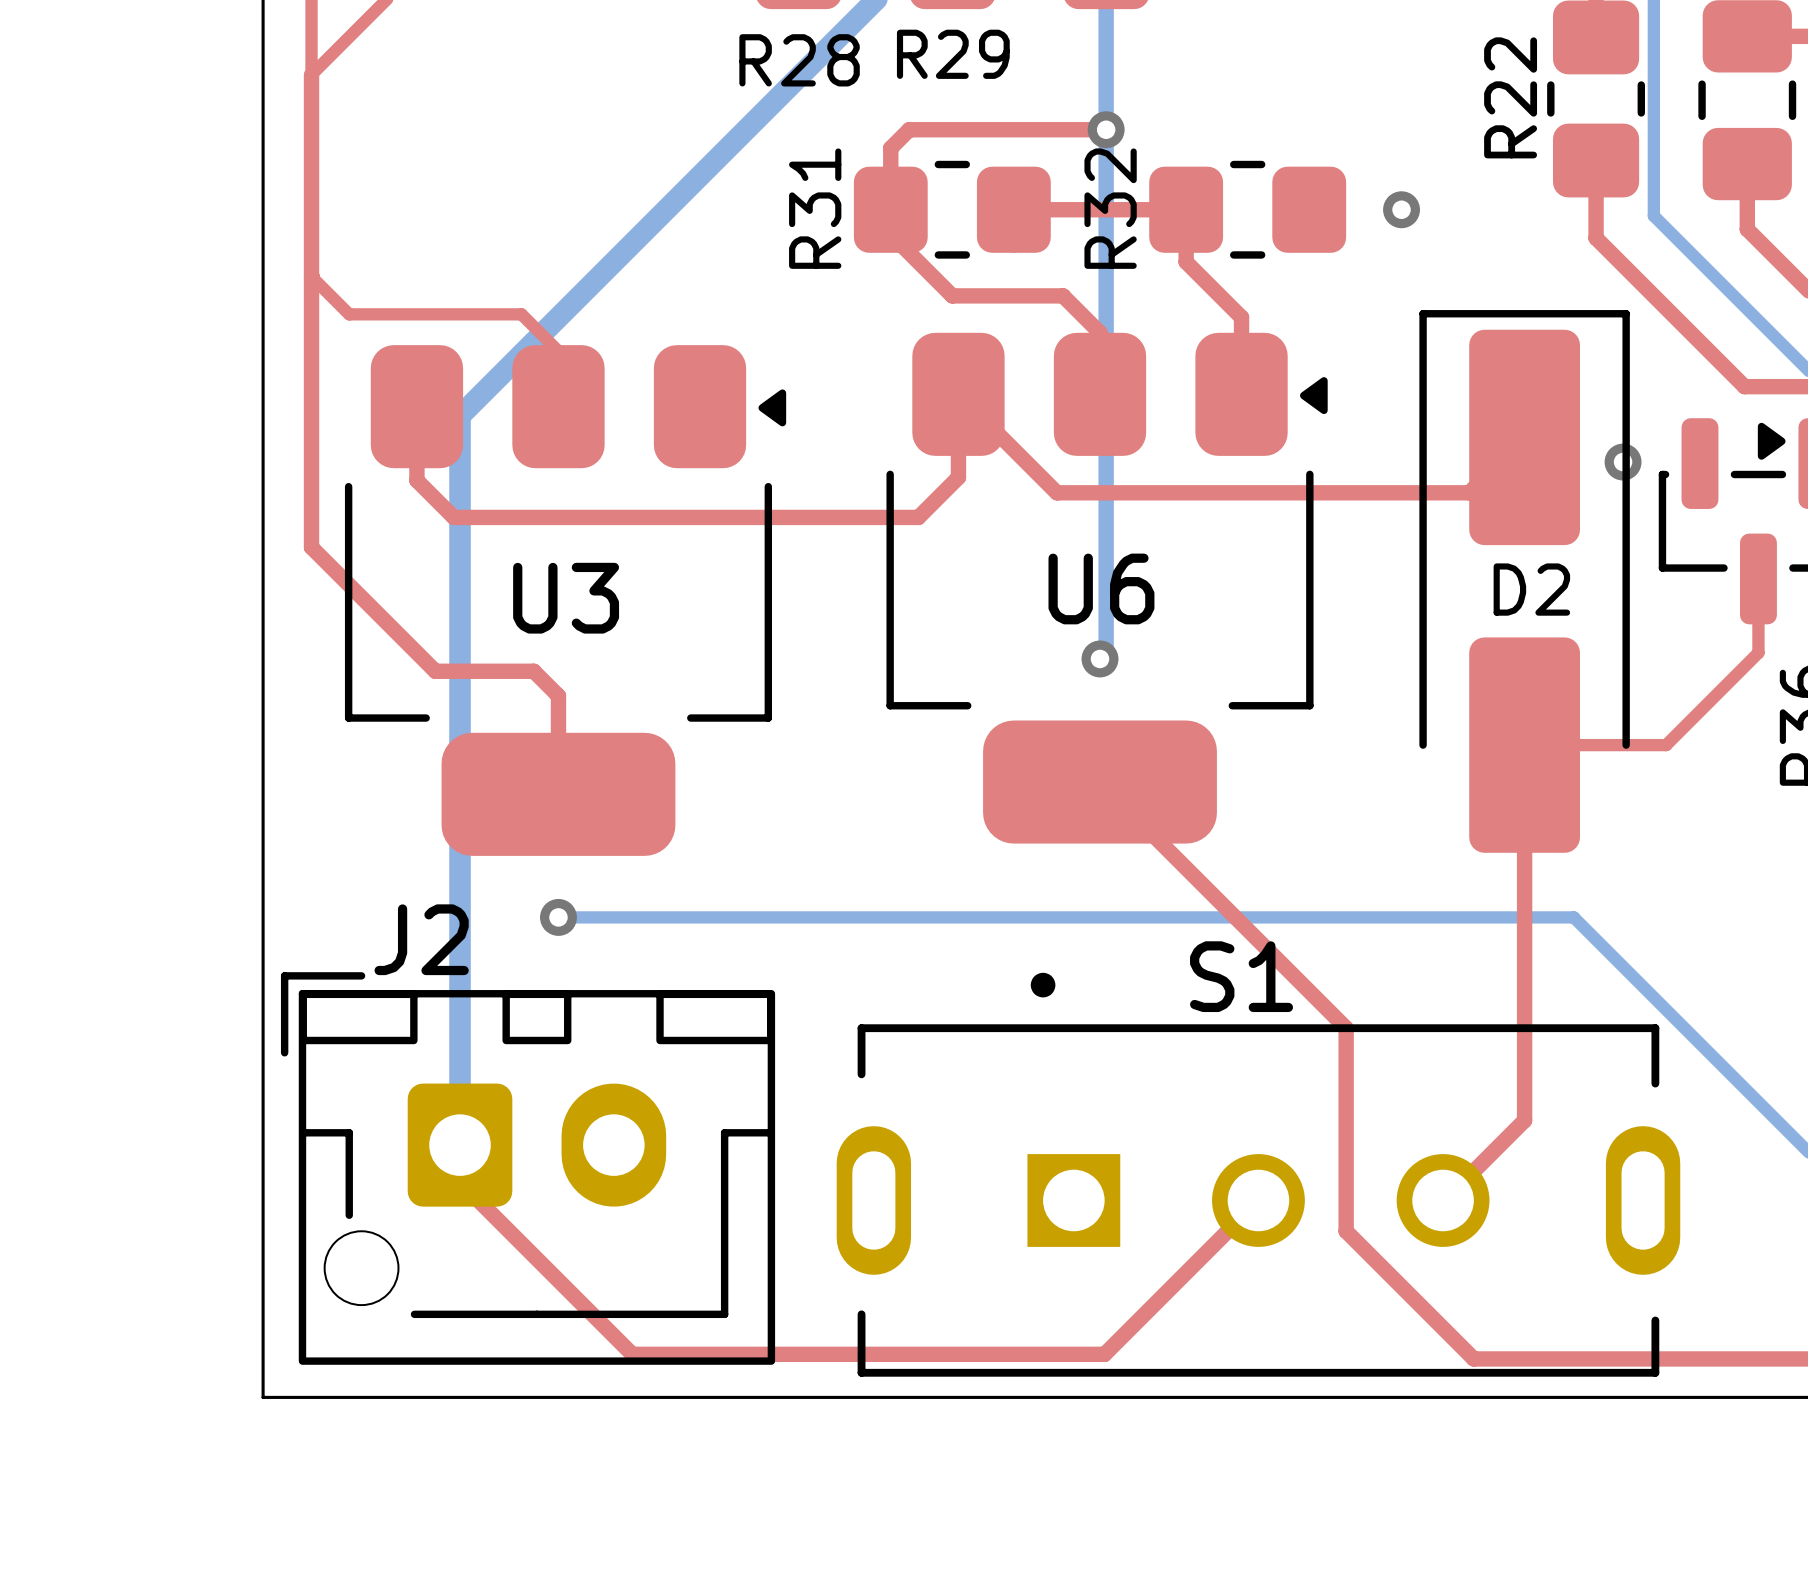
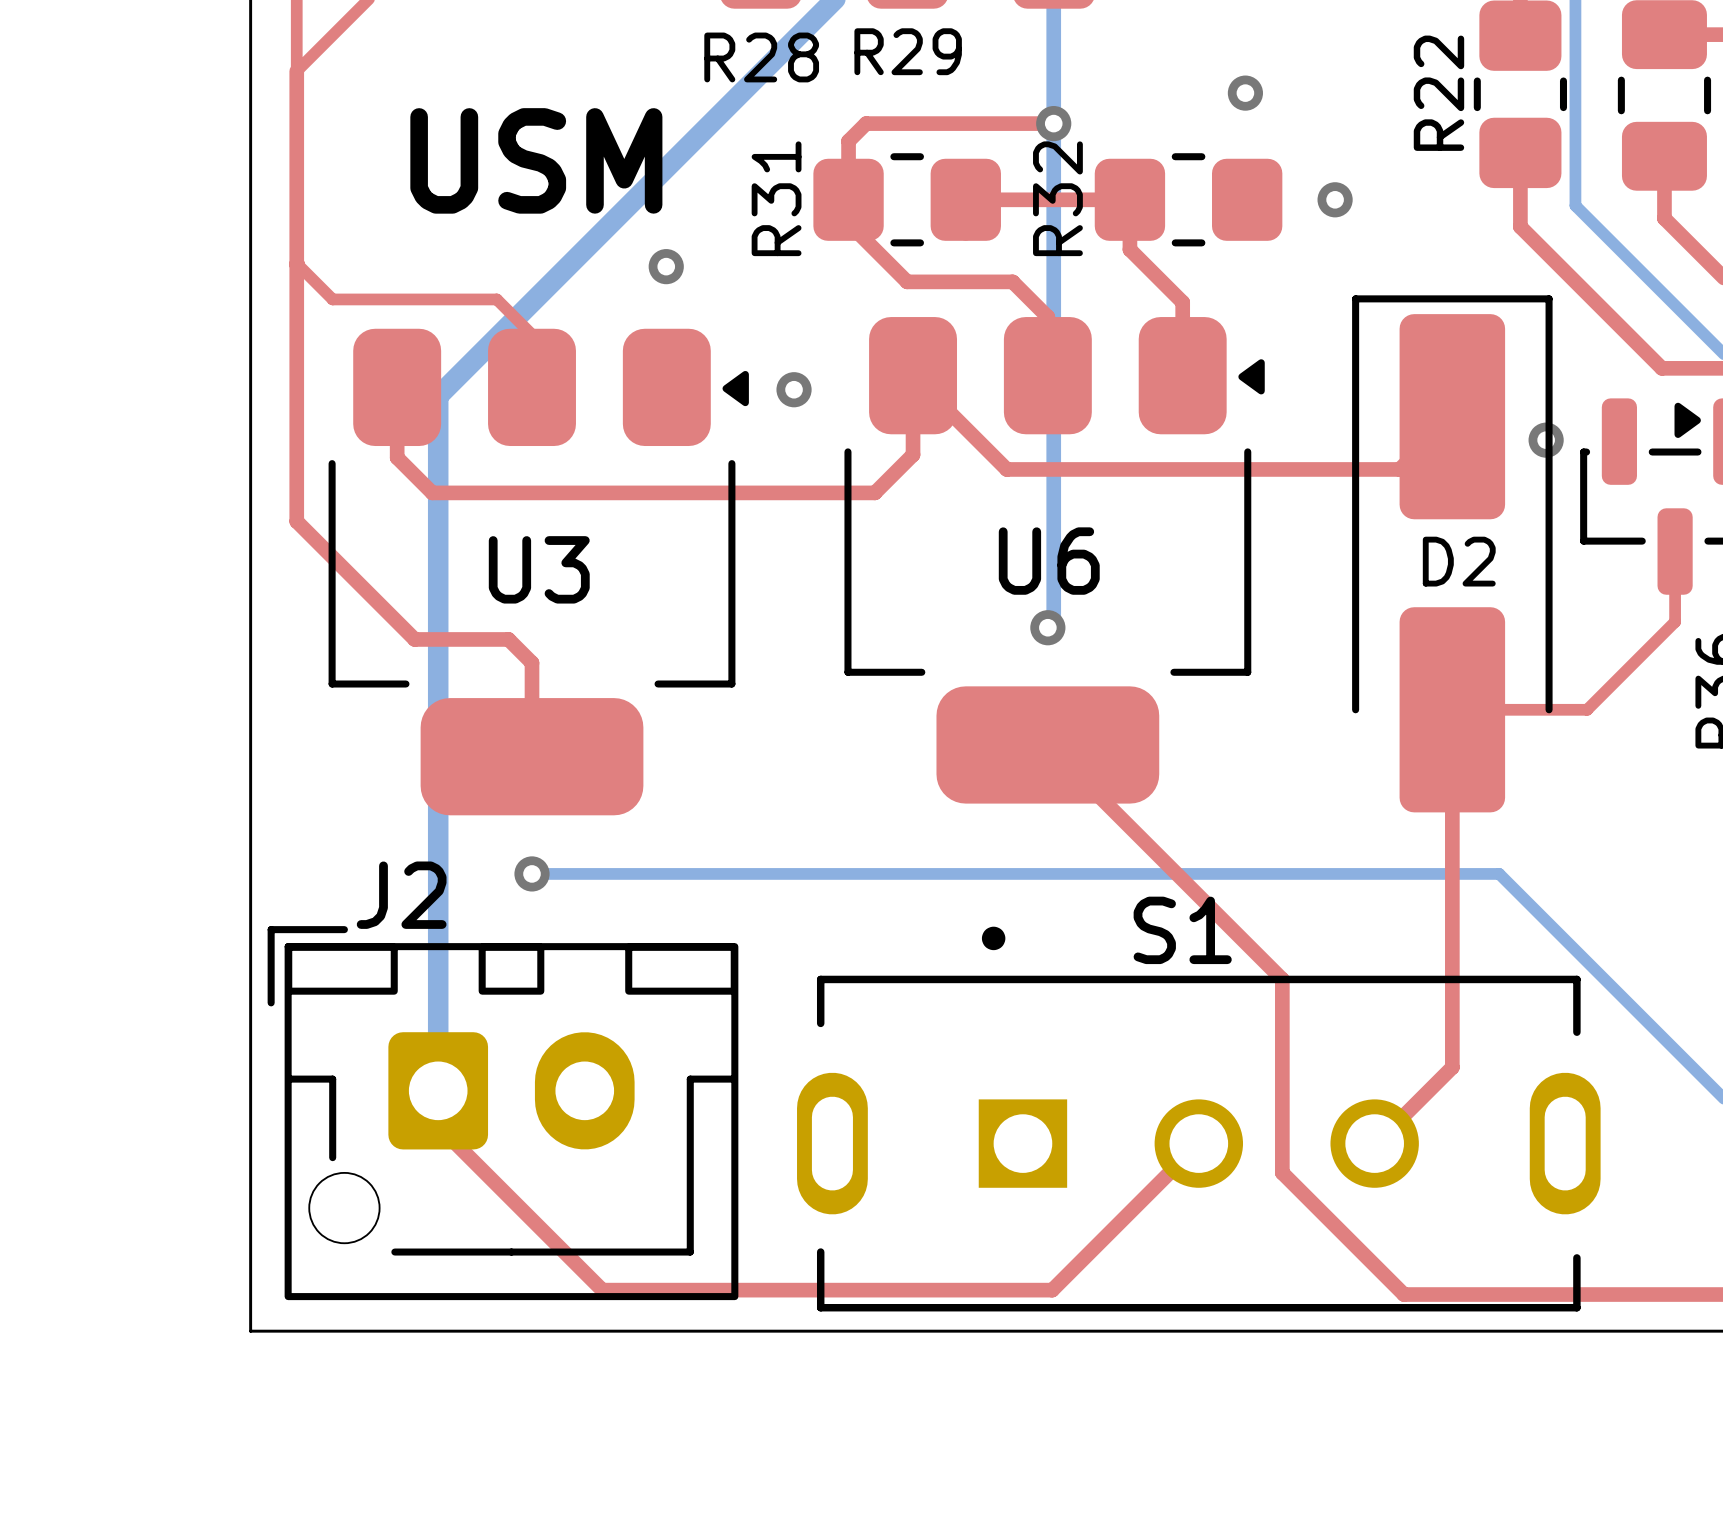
via: none -> (1245, 93)
text: none -> USM (536, 160)
via: none -> (666, 266)
via: none -> (794, 389)

